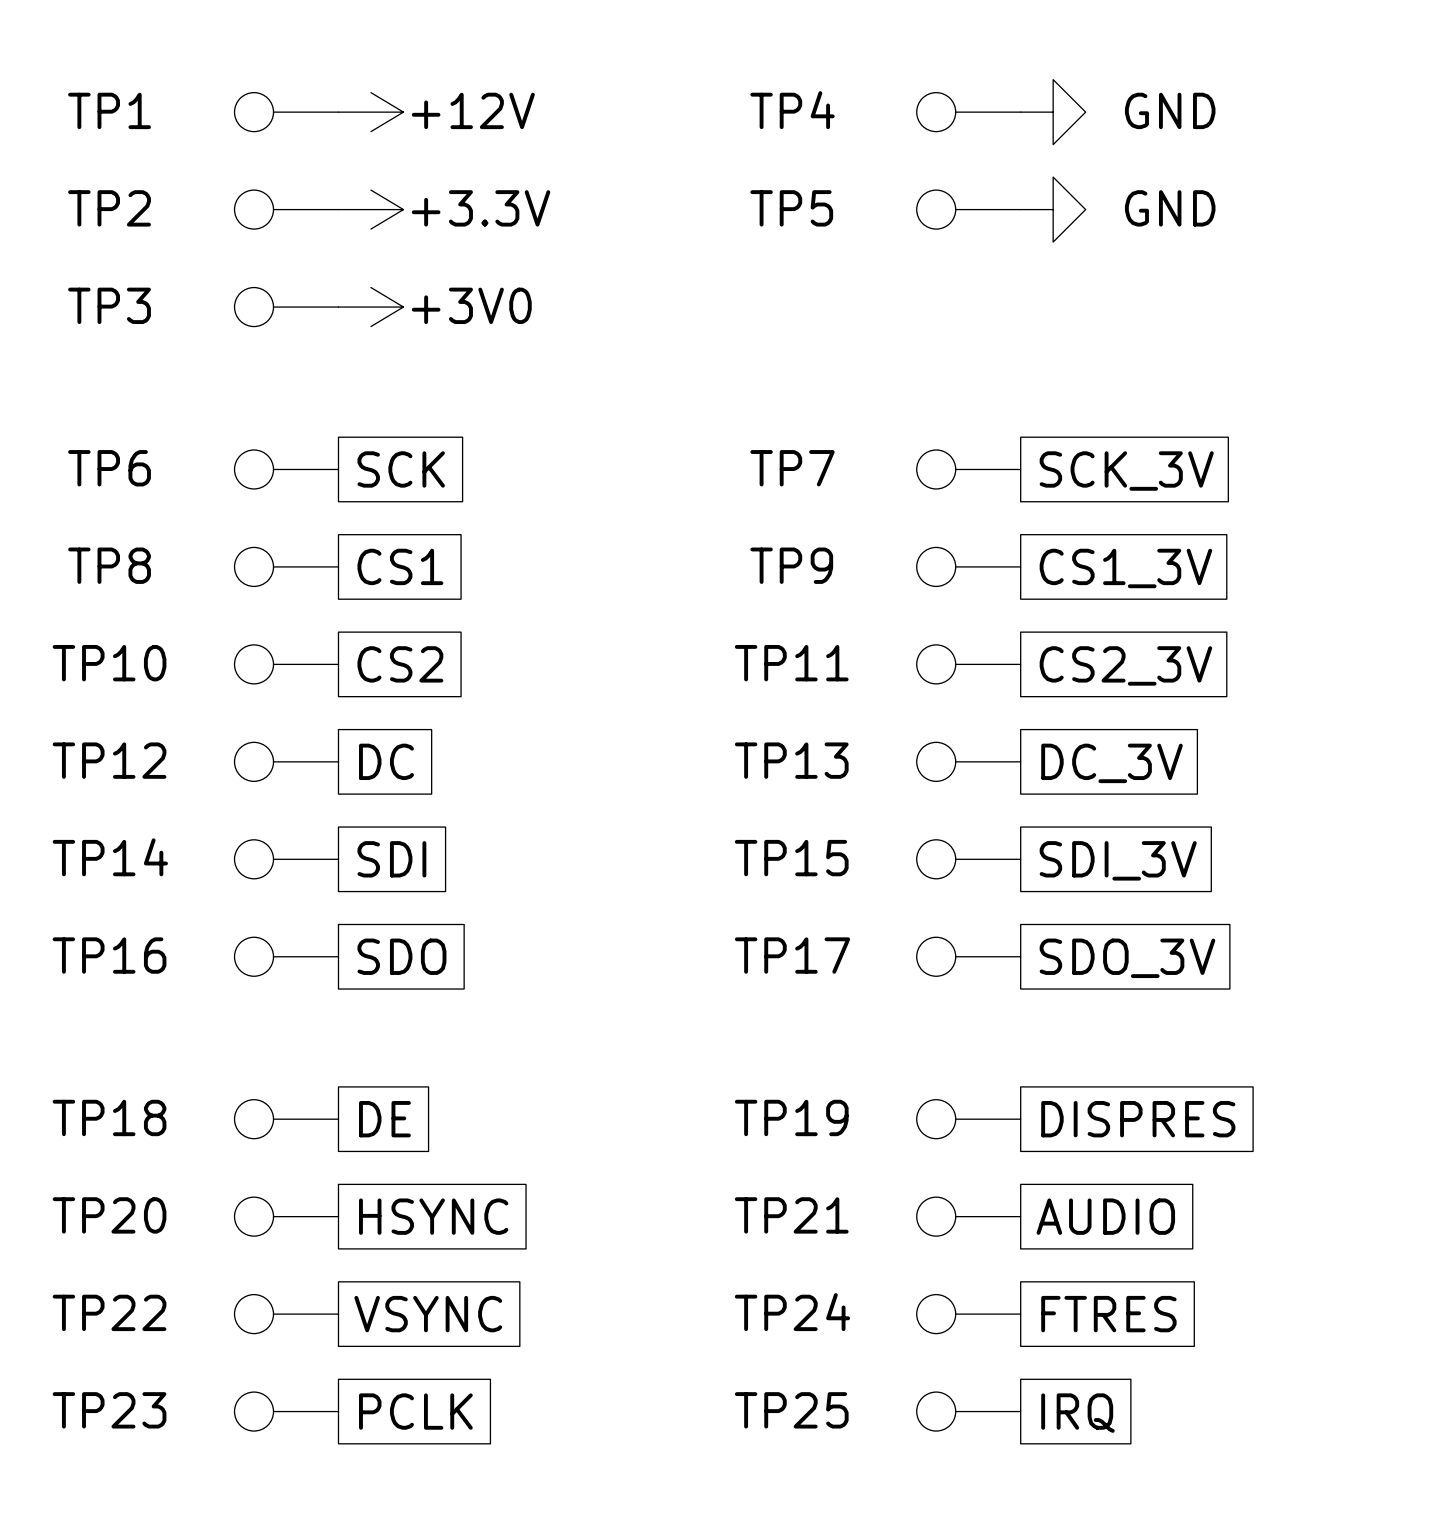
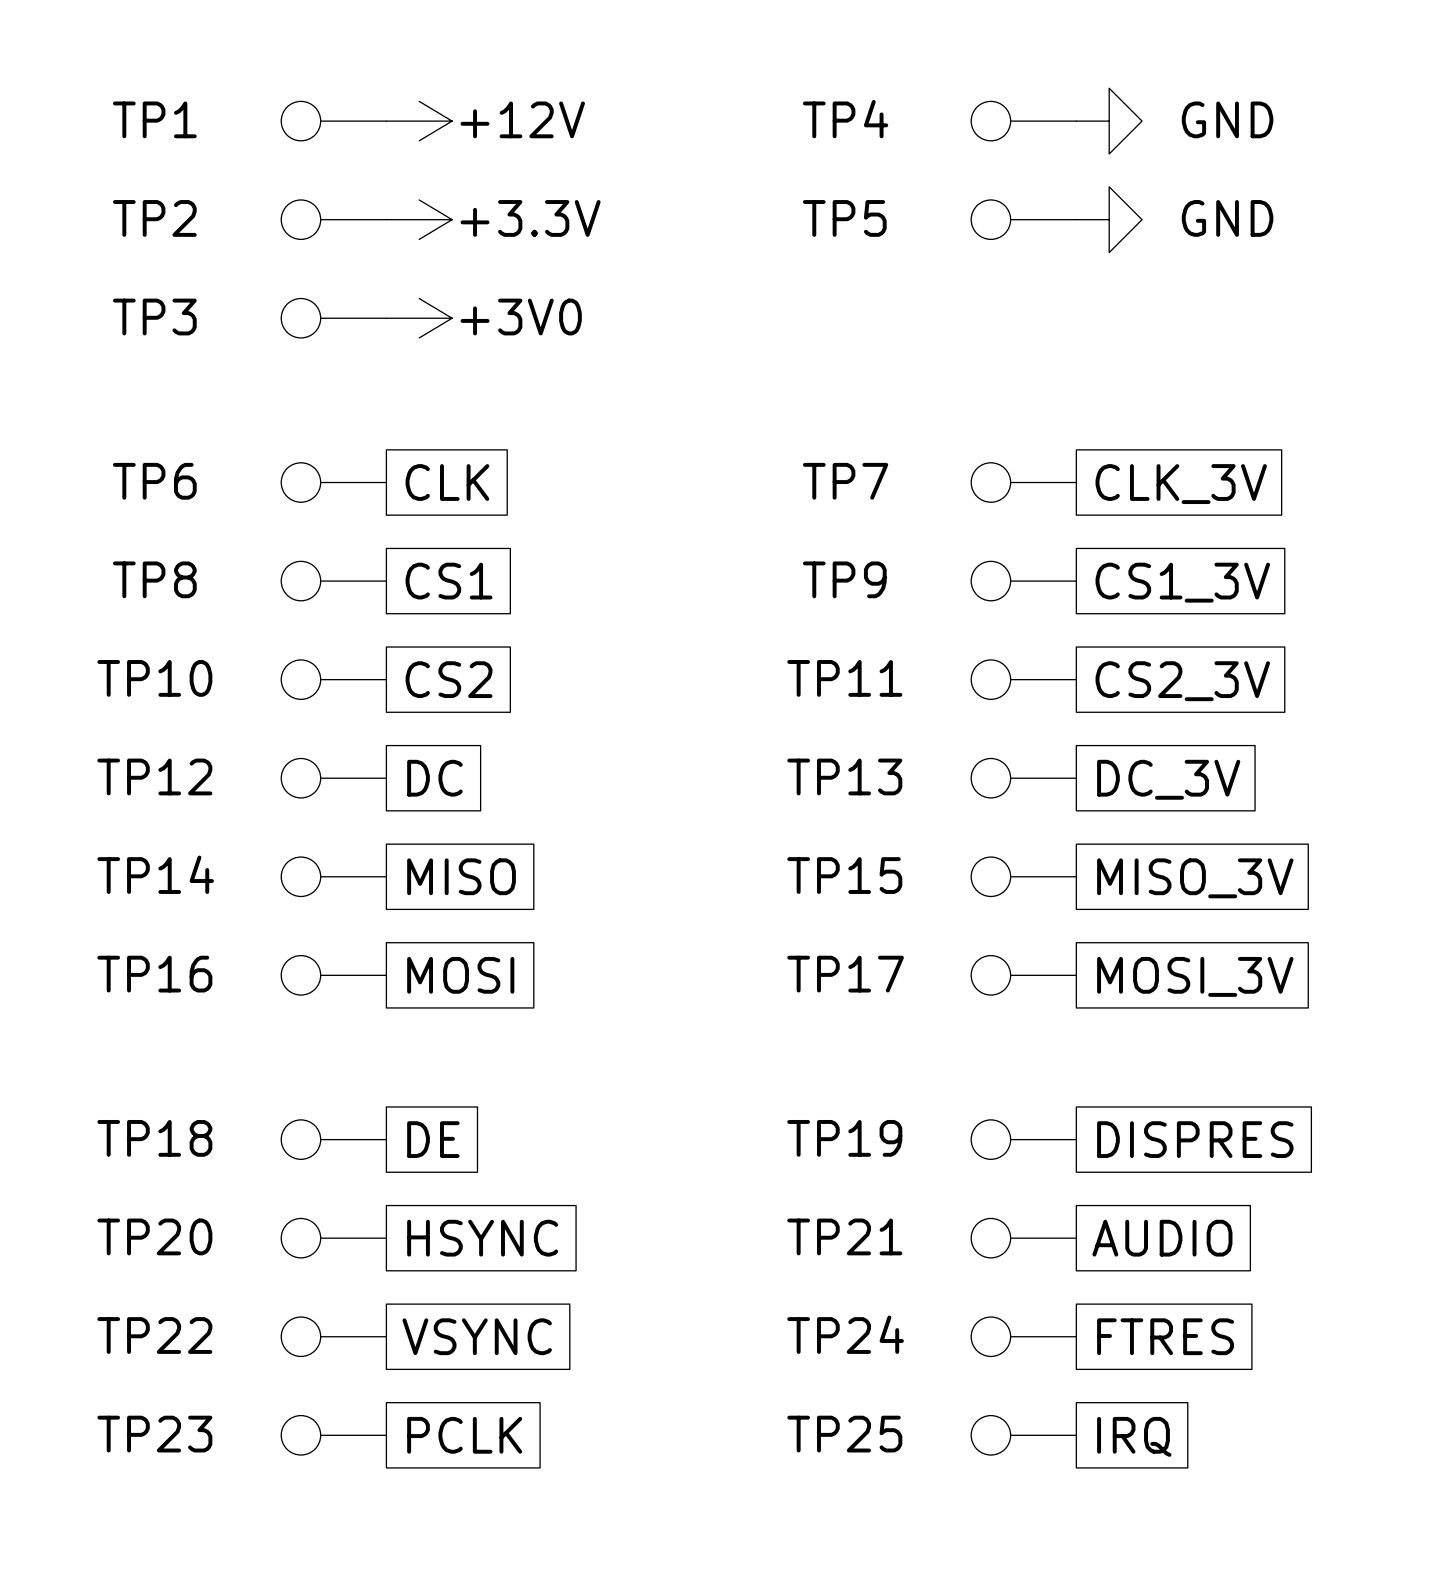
global label: SCK (401, 469) -> CLK (447, 482)
global label: SCK_3V (1126, 471) -> CLK_3V (1181, 484)
global label: SDI (391, 859) -> MISO (461, 876)
global label: SDI_3V (1118, 860) -> MISO_3V (1195, 878)
global label: SDO (401, 956) -> MOSI (460, 975)
global label: SDO_3V (1127, 958) -> MOSI_3V (1195, 976)

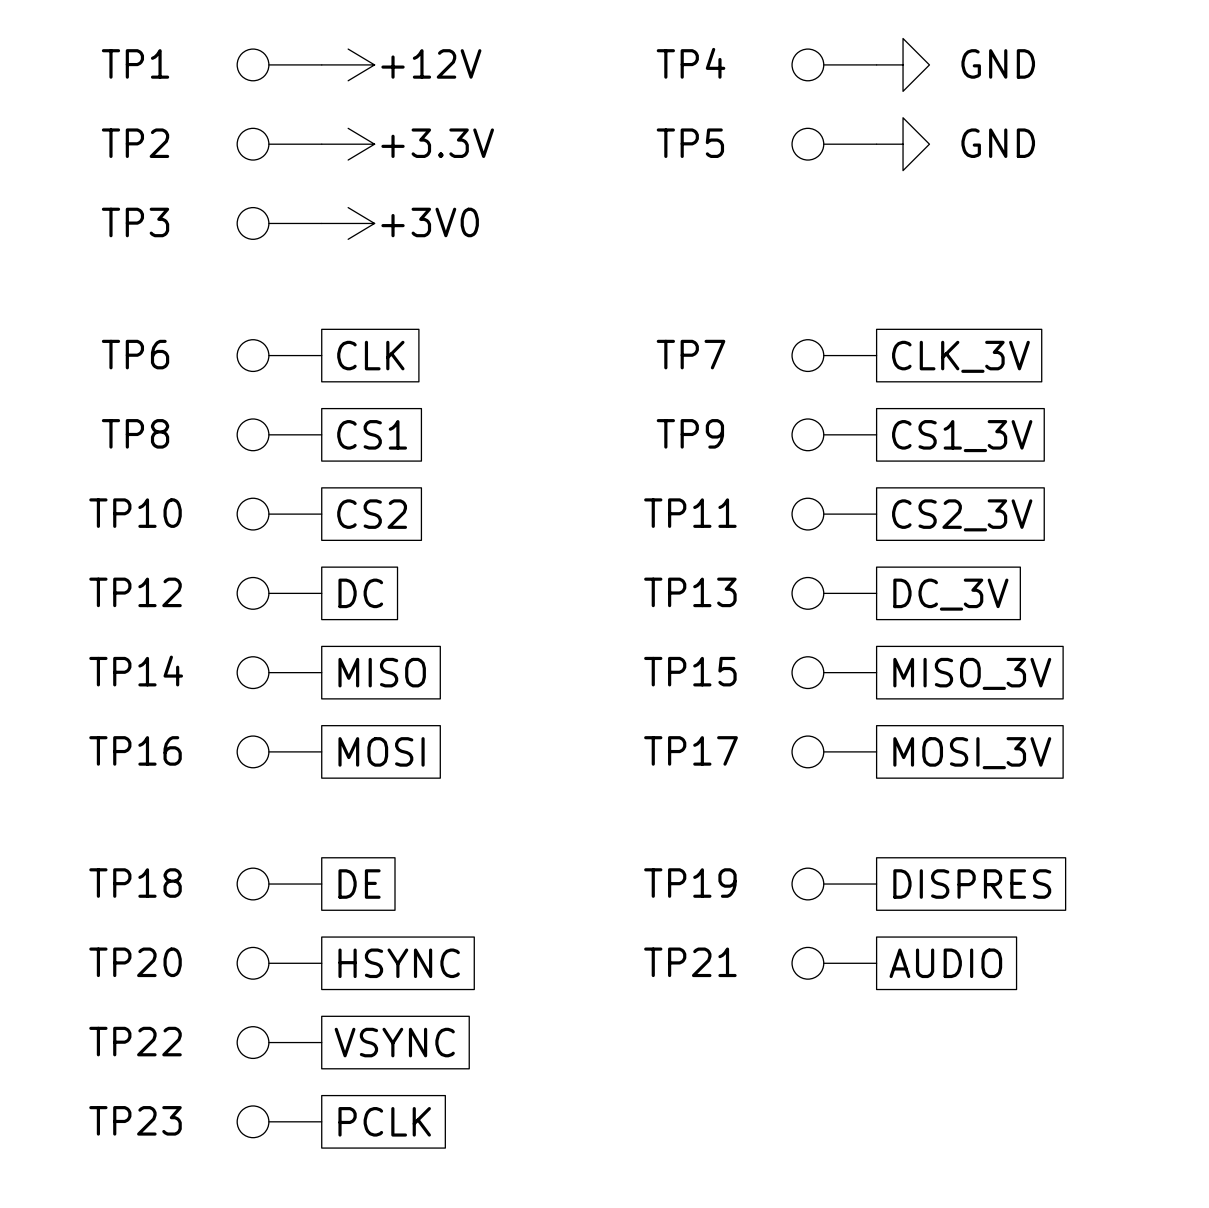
TP24: (1023, 1336) -> none
global label: FTRES (1165, 1336) -> none
TP25: (1023, 1435) -> none
global label: IRQ (1134, 1436) -> none

